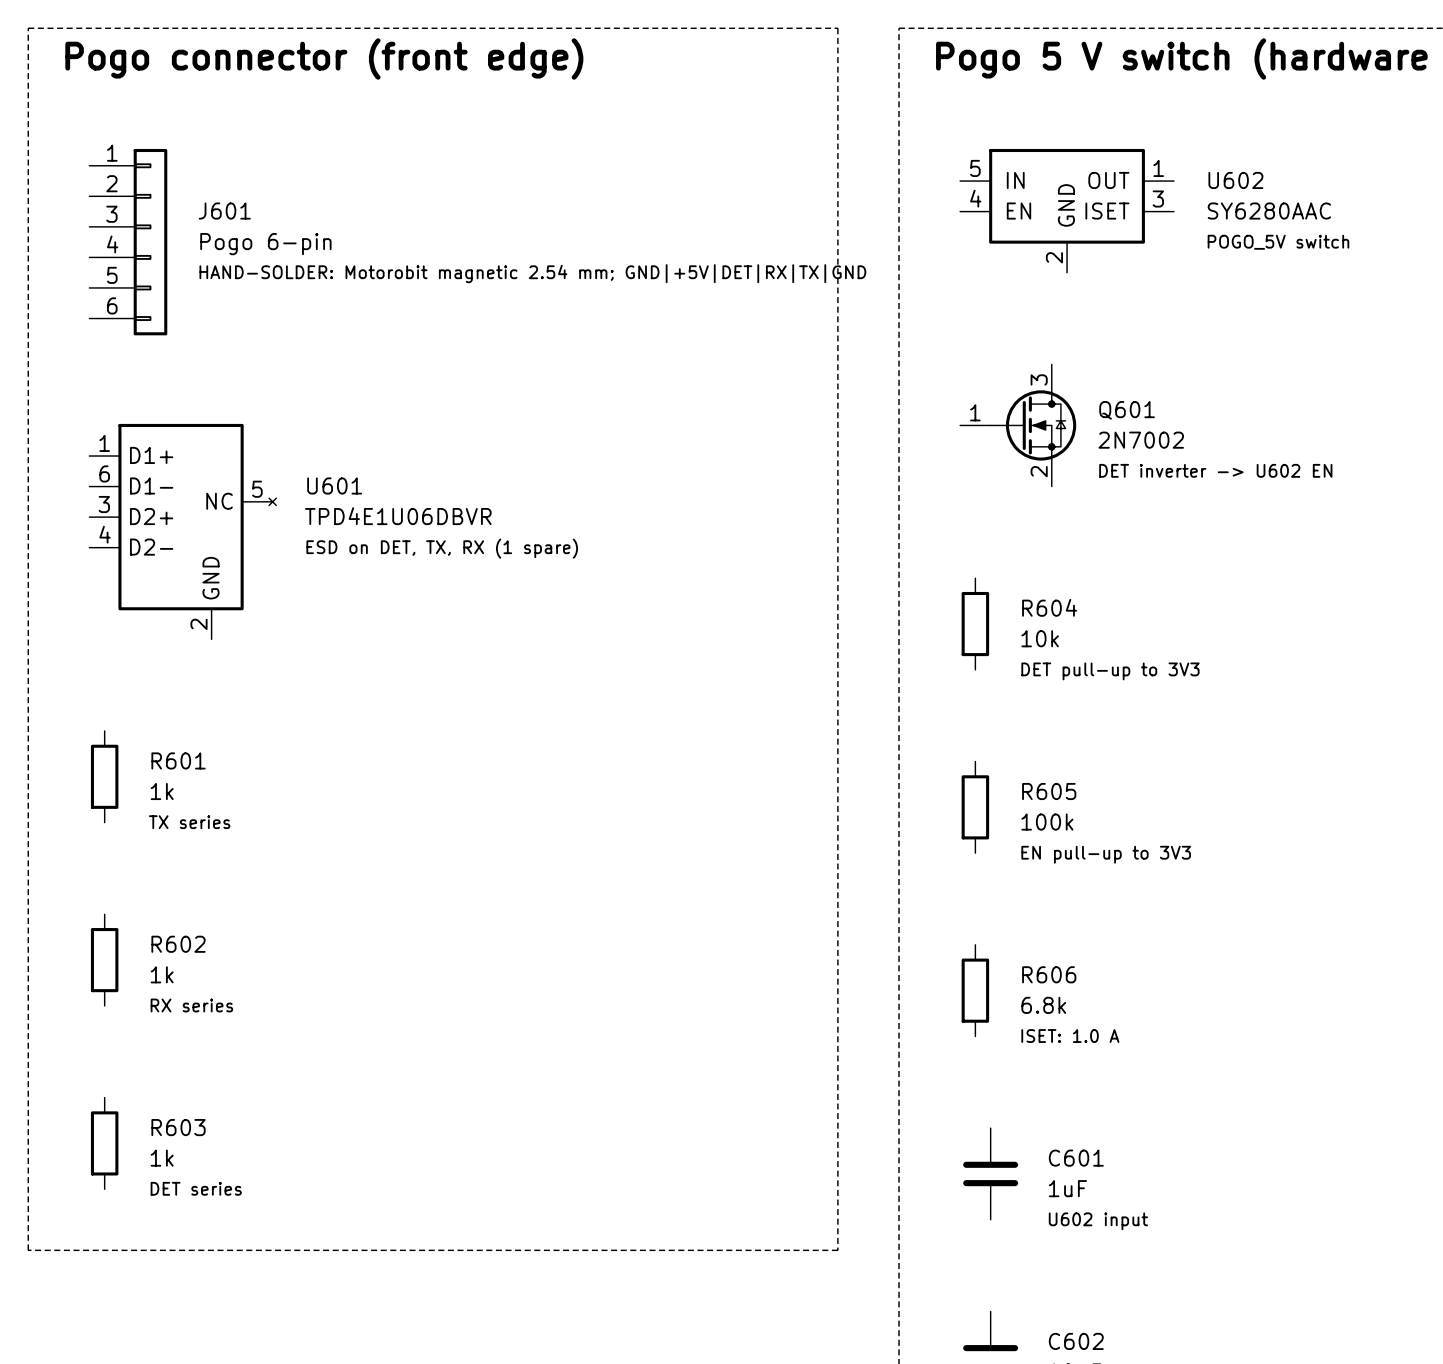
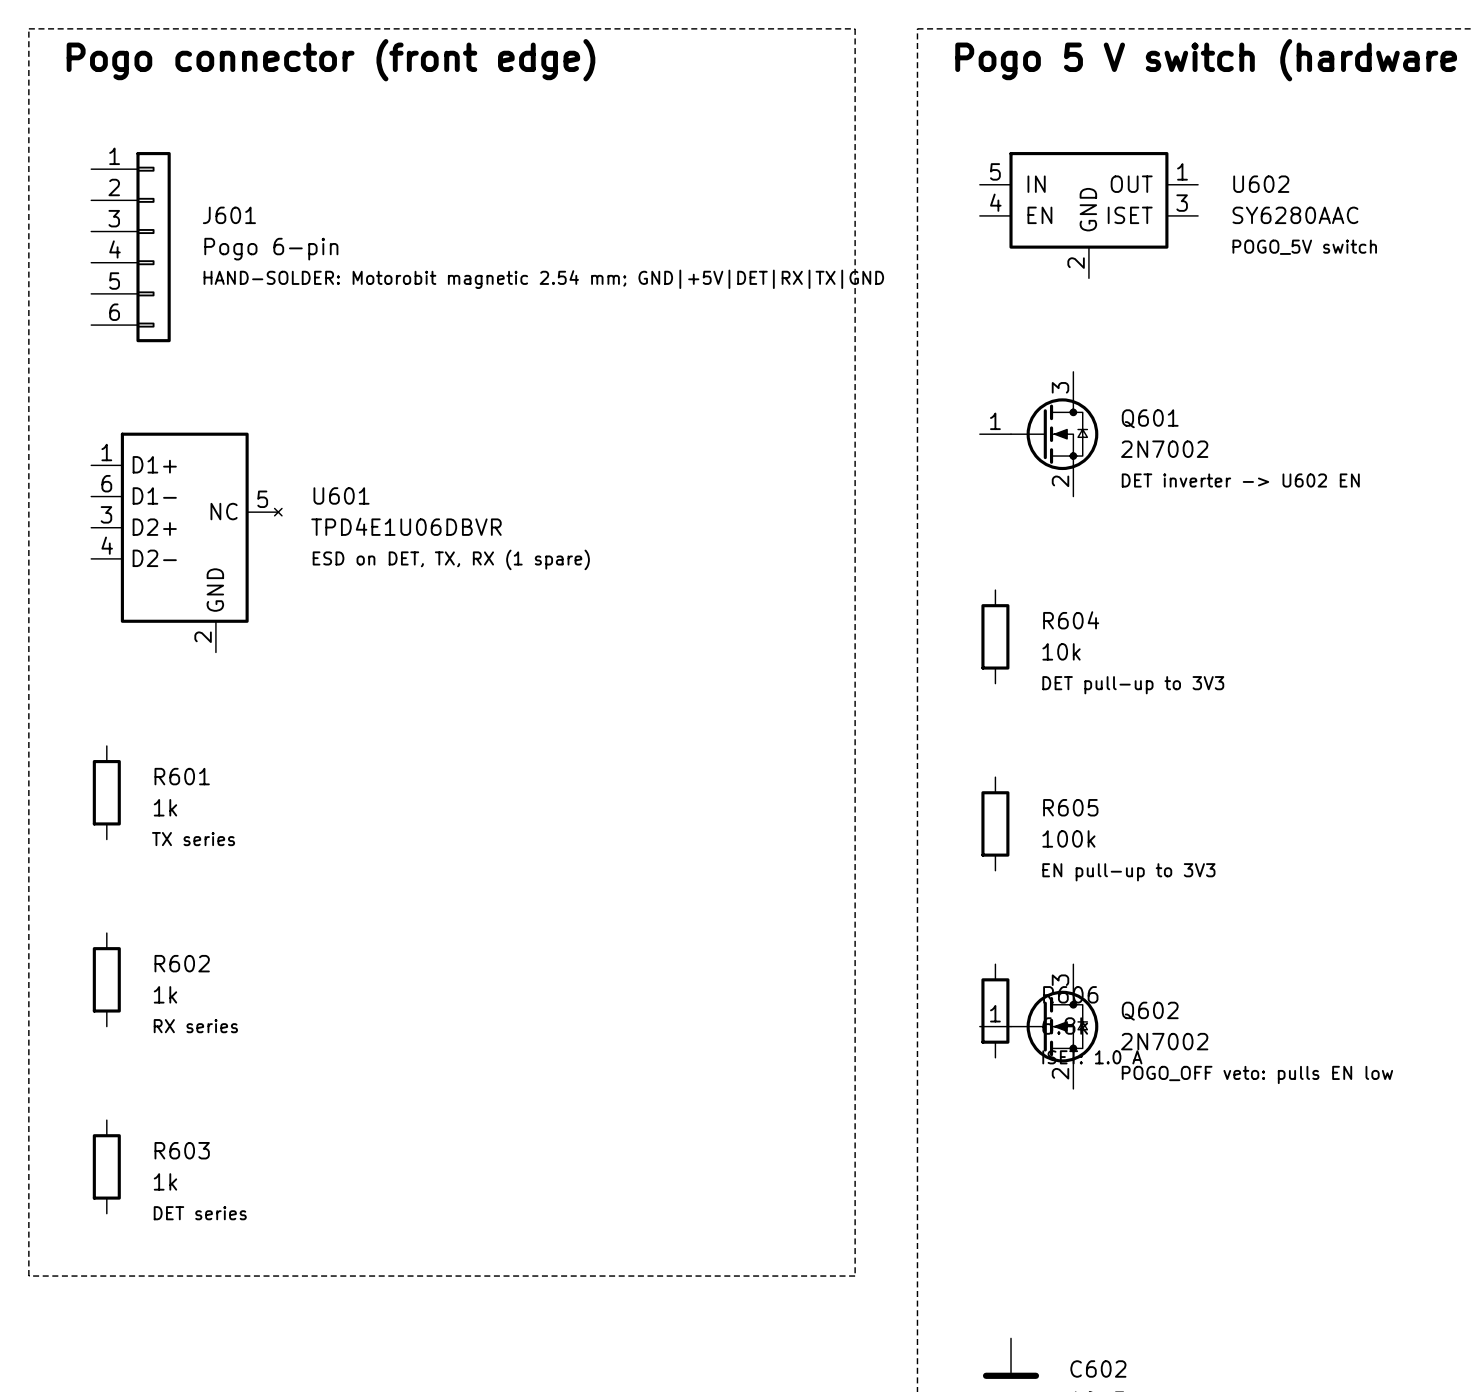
Q602: none -> 2N7002 (1039, 1026)
C601: 1uF (990, 1173) -> none

